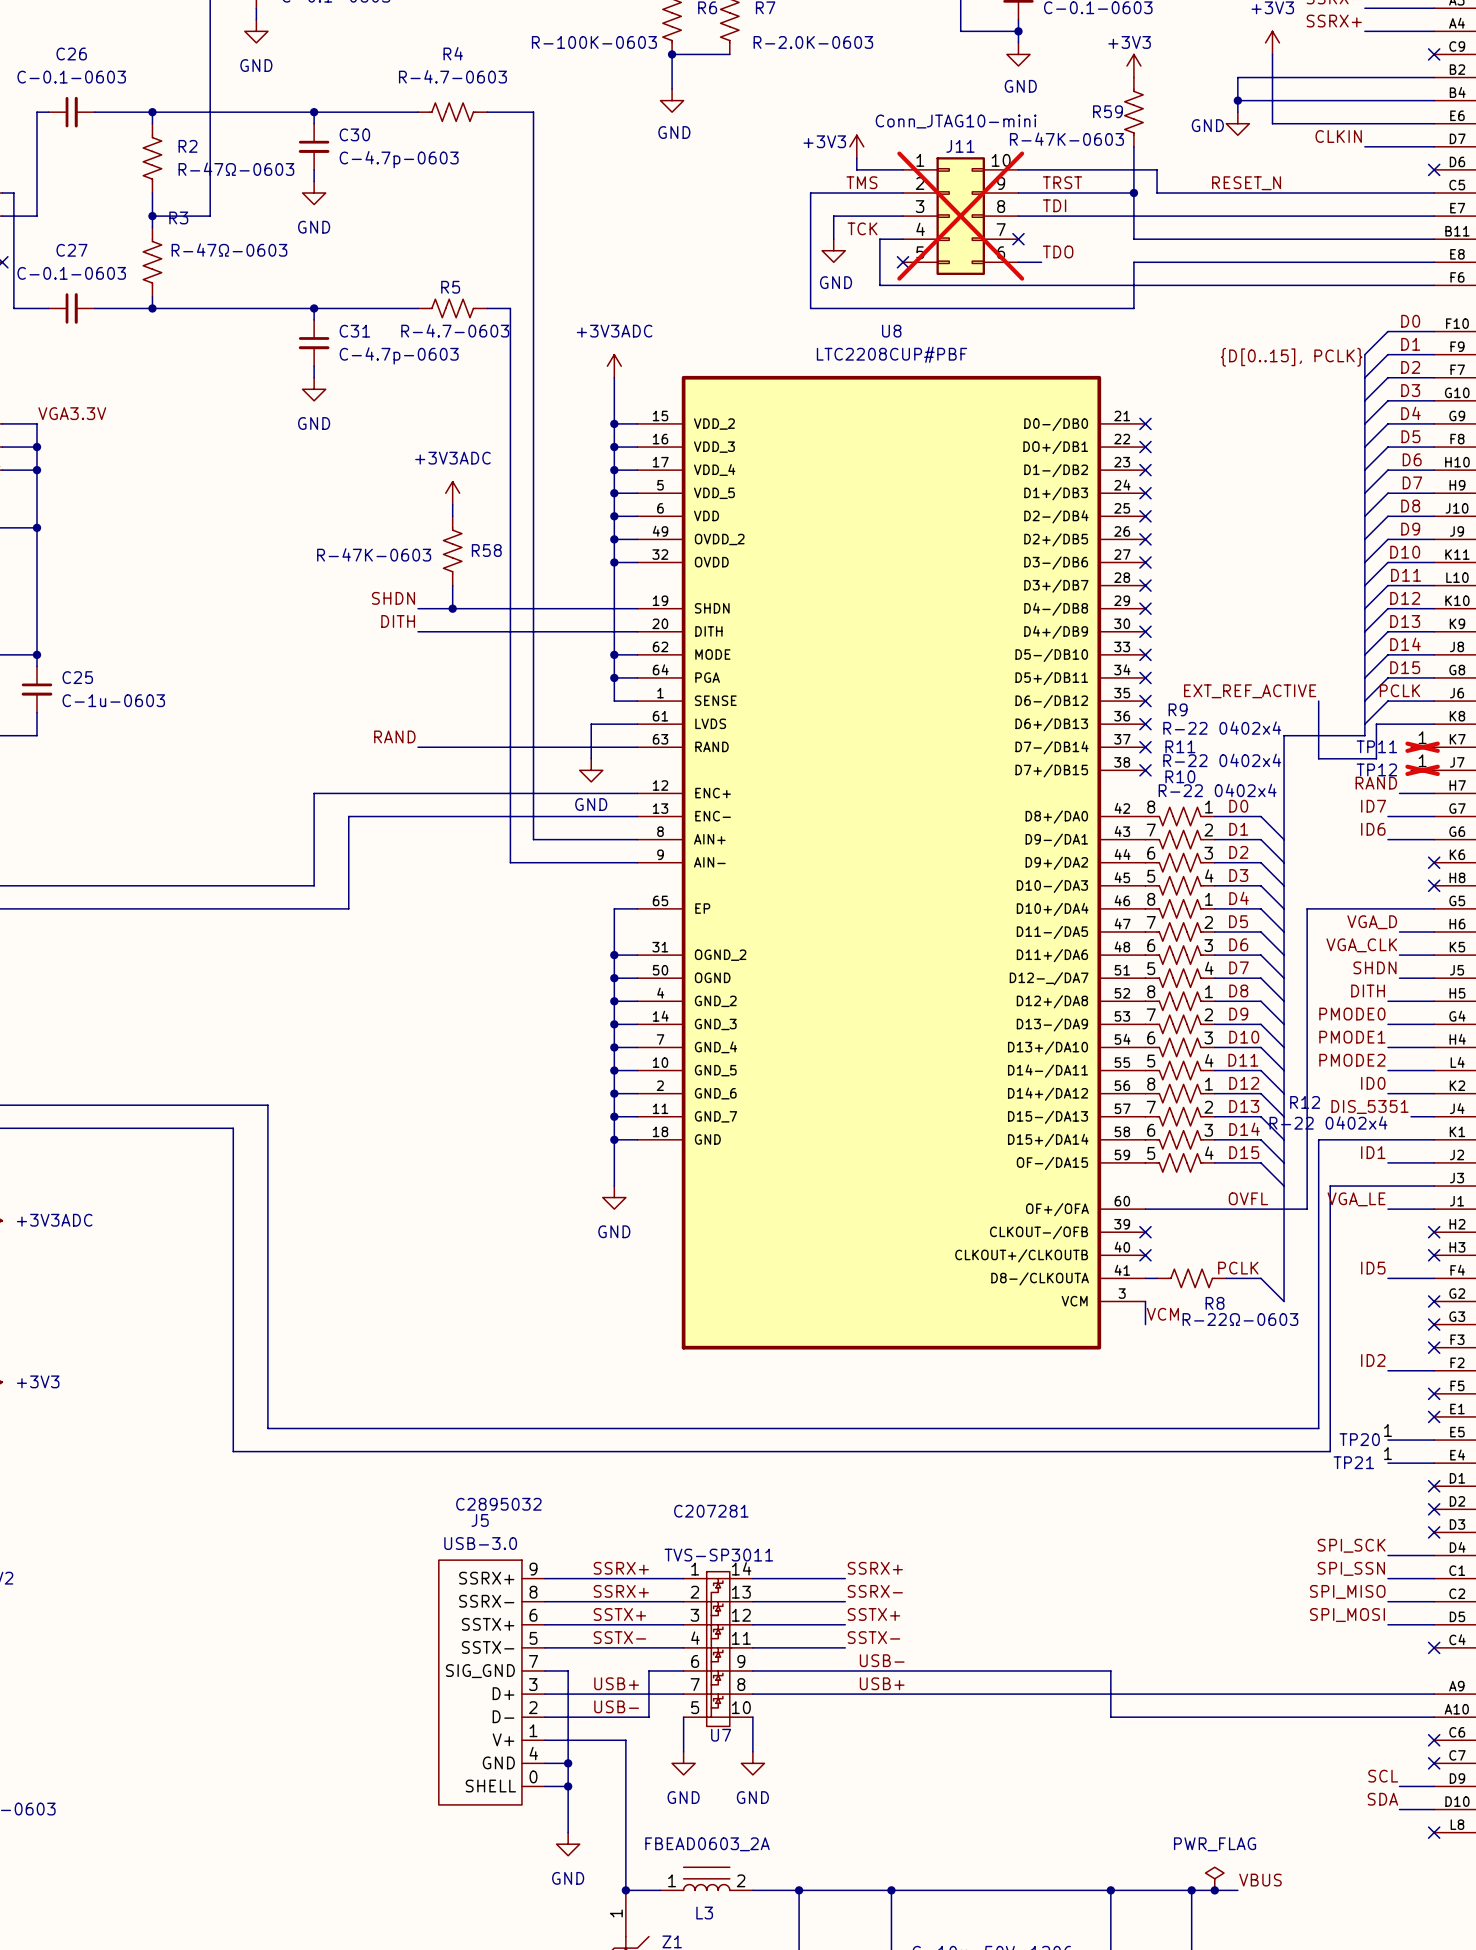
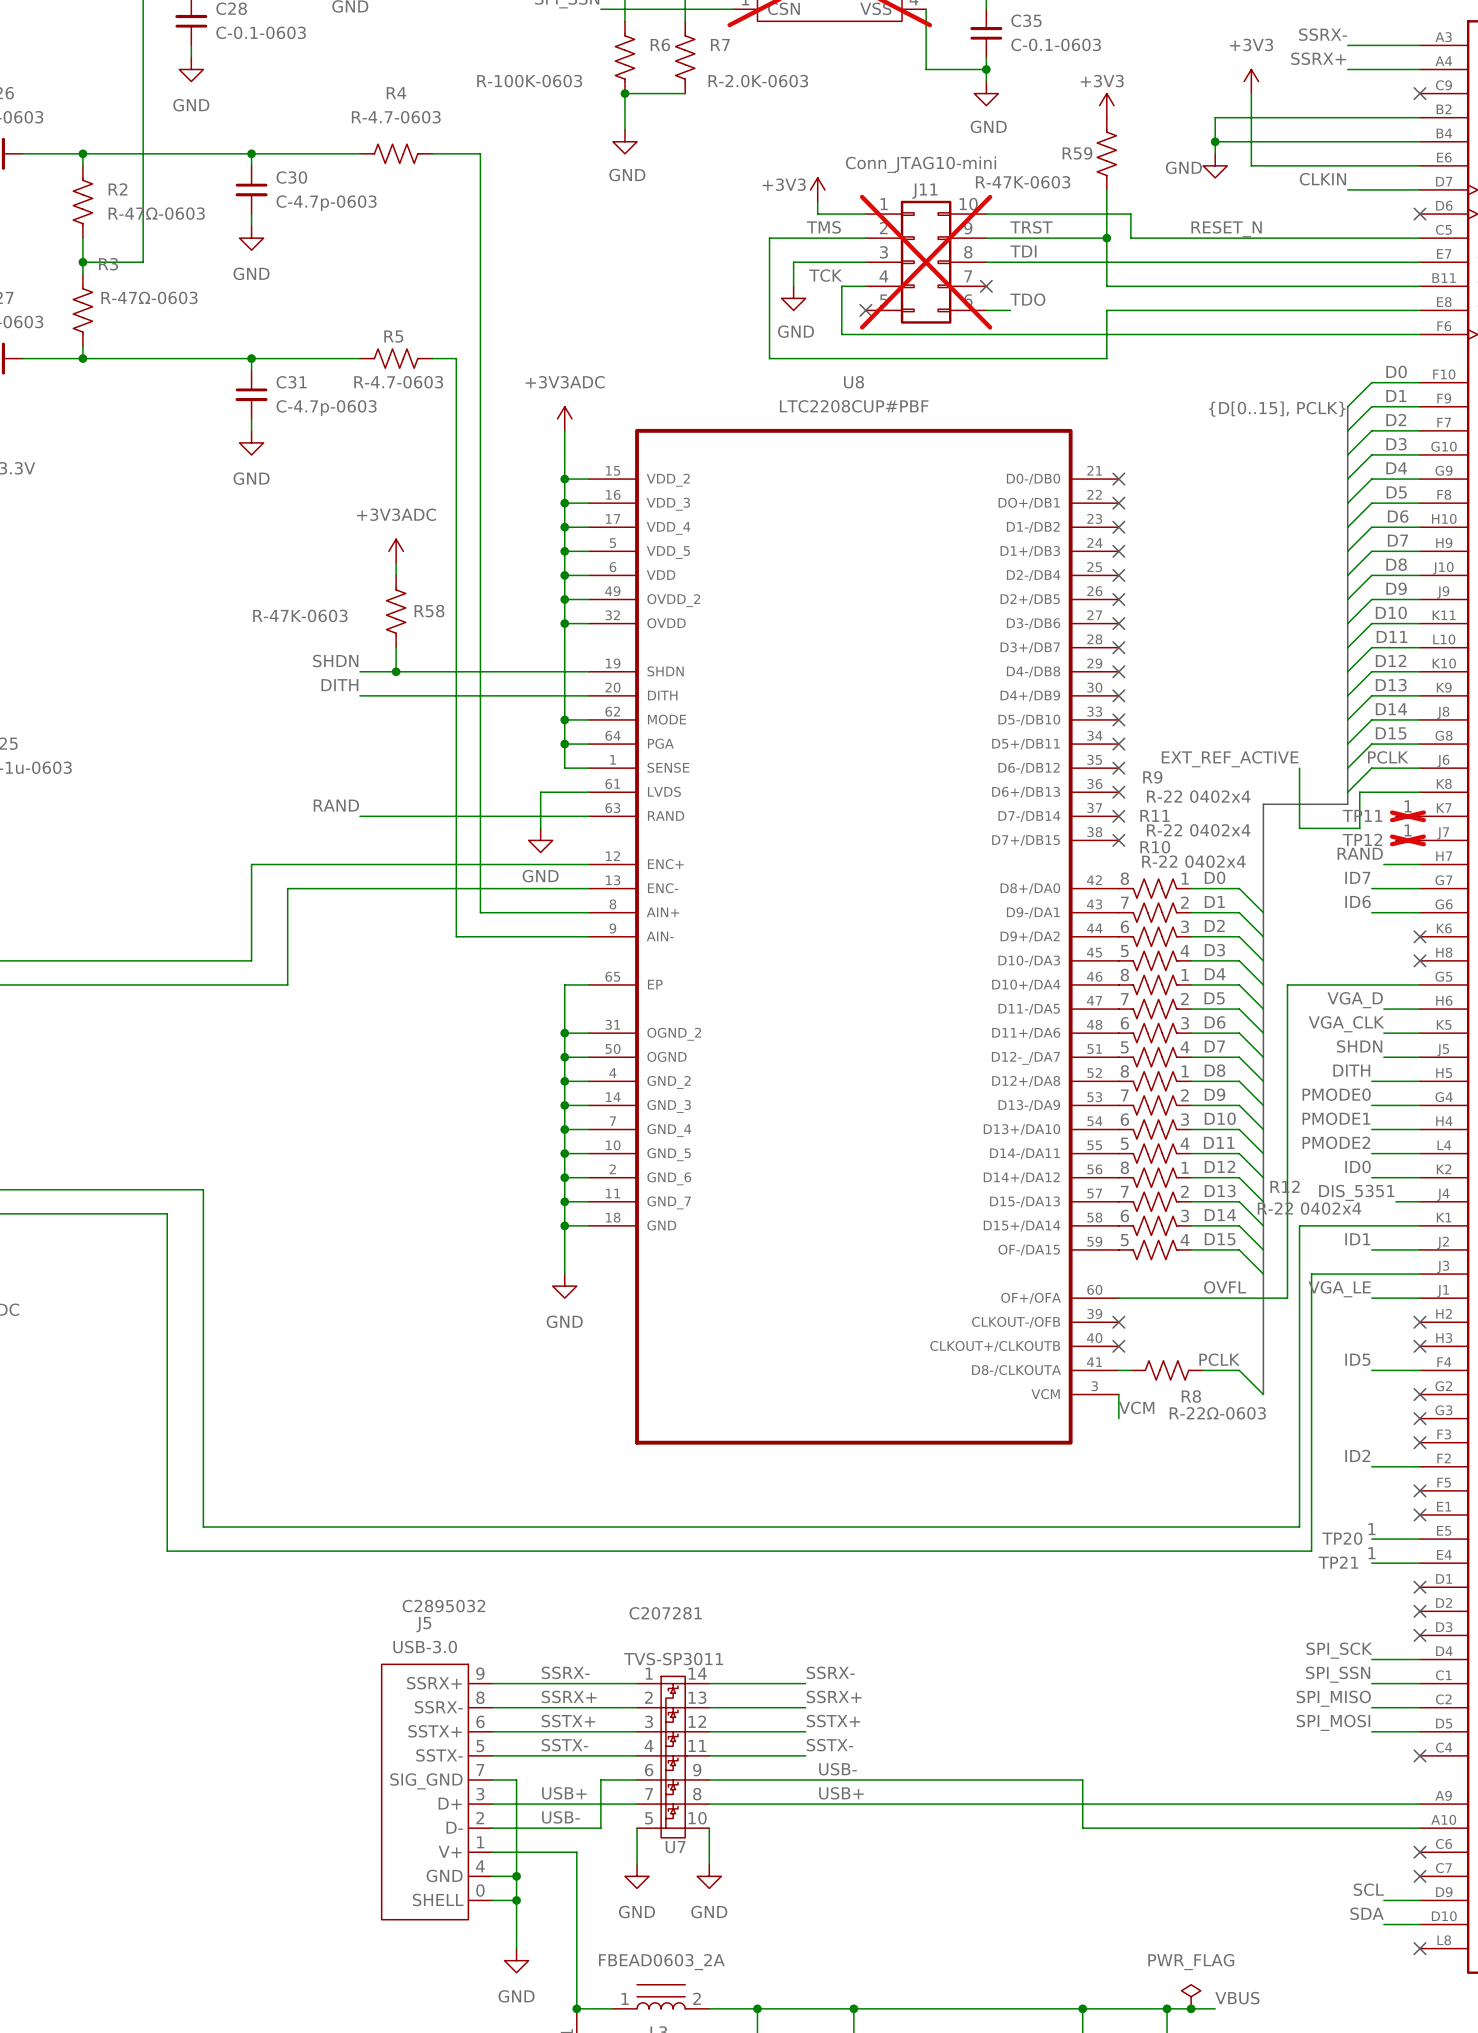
label: SSRX+ (621, 1568) -> SSRX- (565, 1672)
label: SSRX+ (875, 1568) -> SSRX- (830, 1672)
label: SSRX- (875, 1591) -> SSRX+ (834, 1696)

